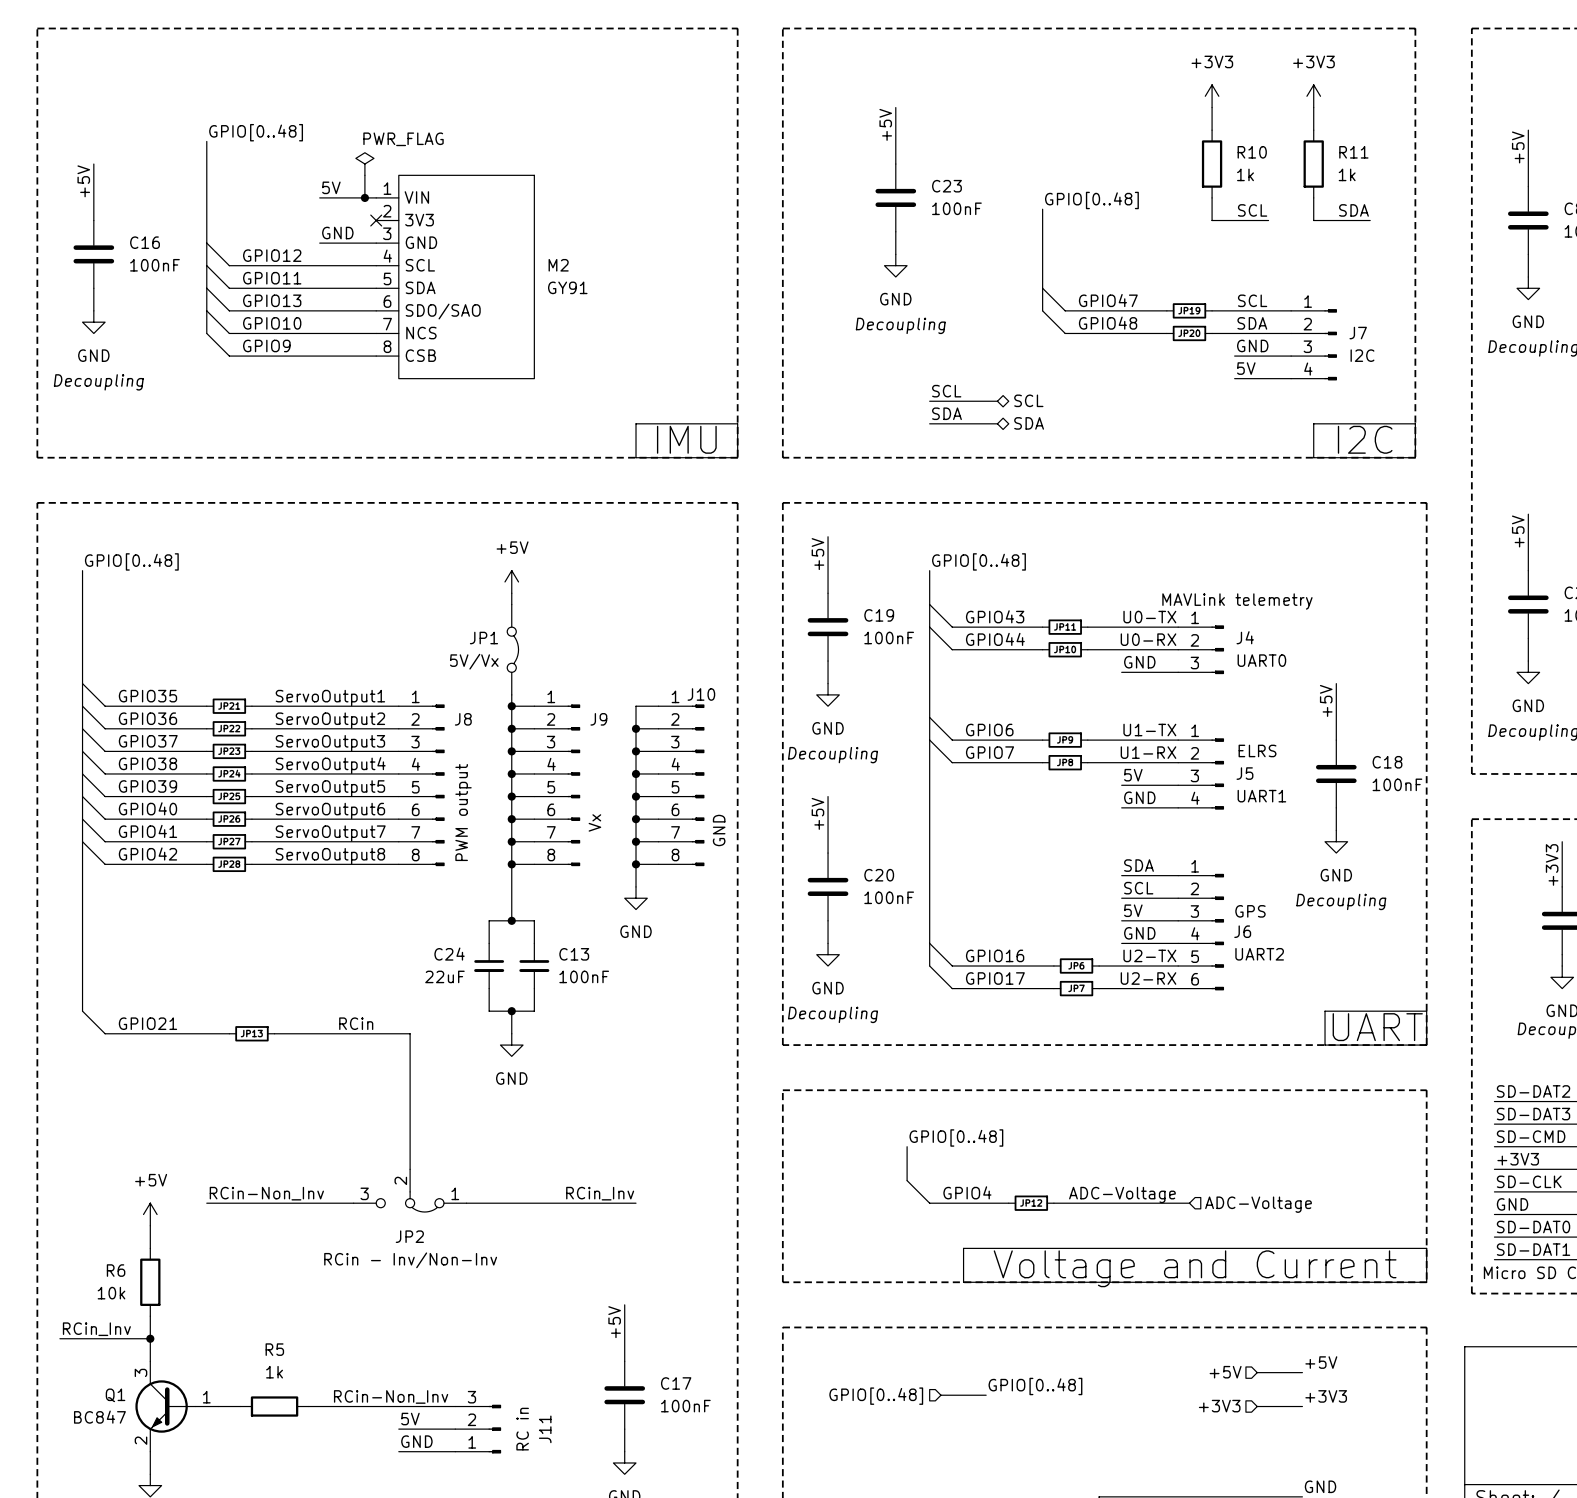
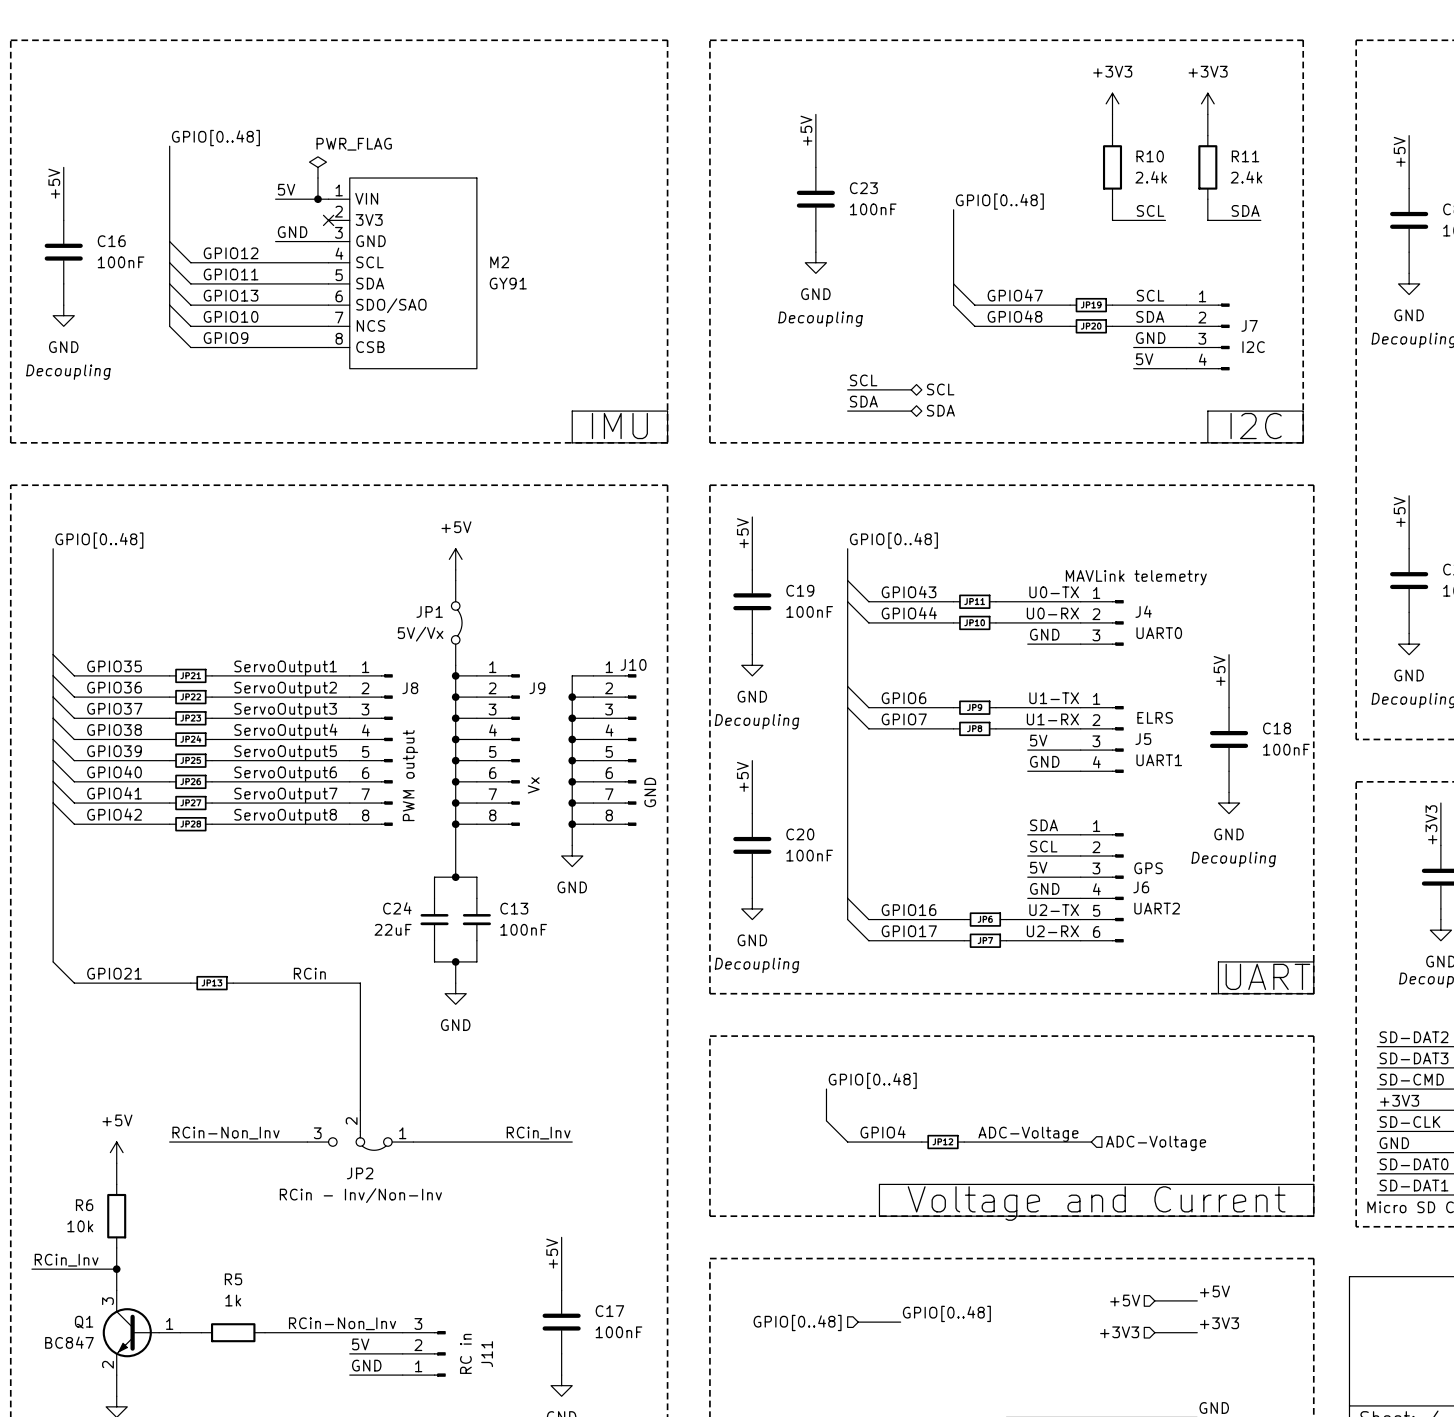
R10 value: 1k (1245, 174) -> 2.4k (1151, 177)
R11 value: 1k (1347, 174) -> 2.4k (1246, 177)

